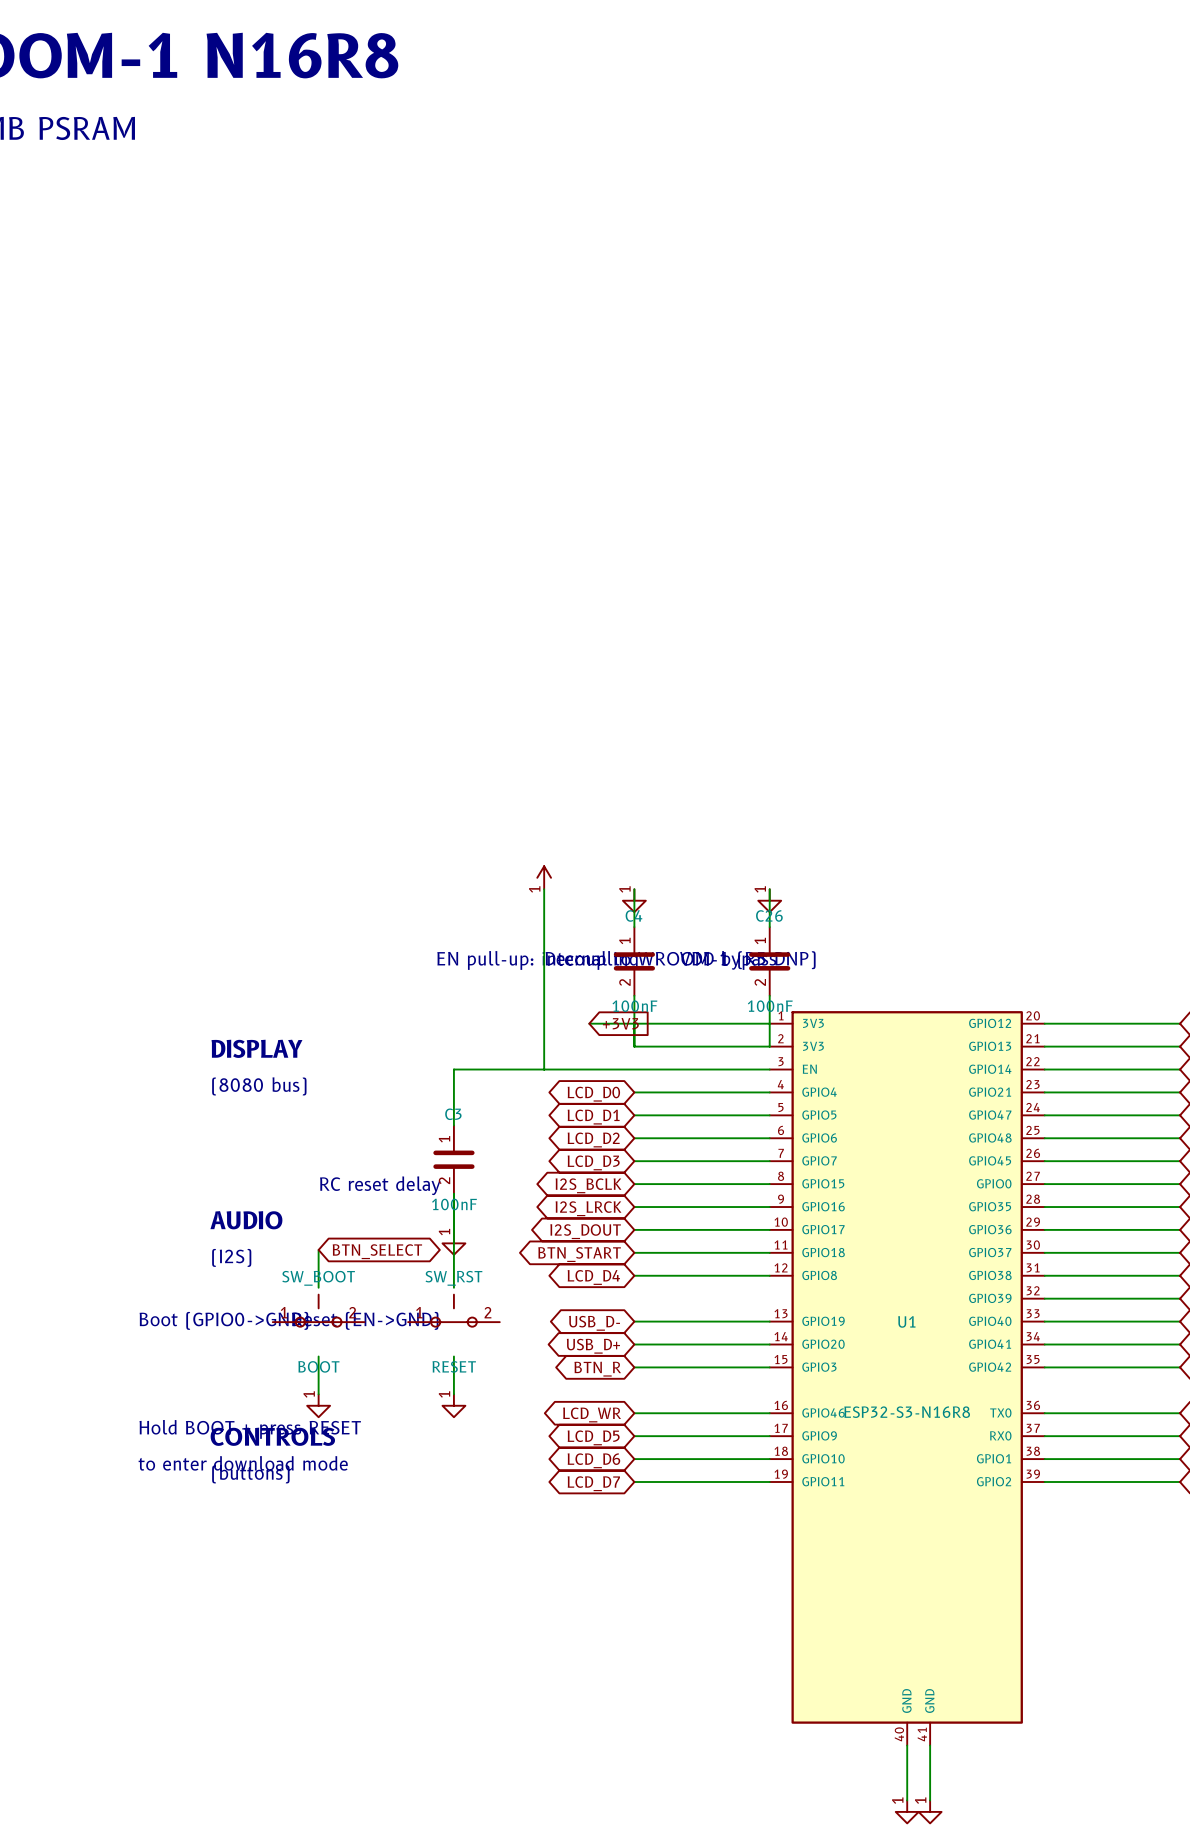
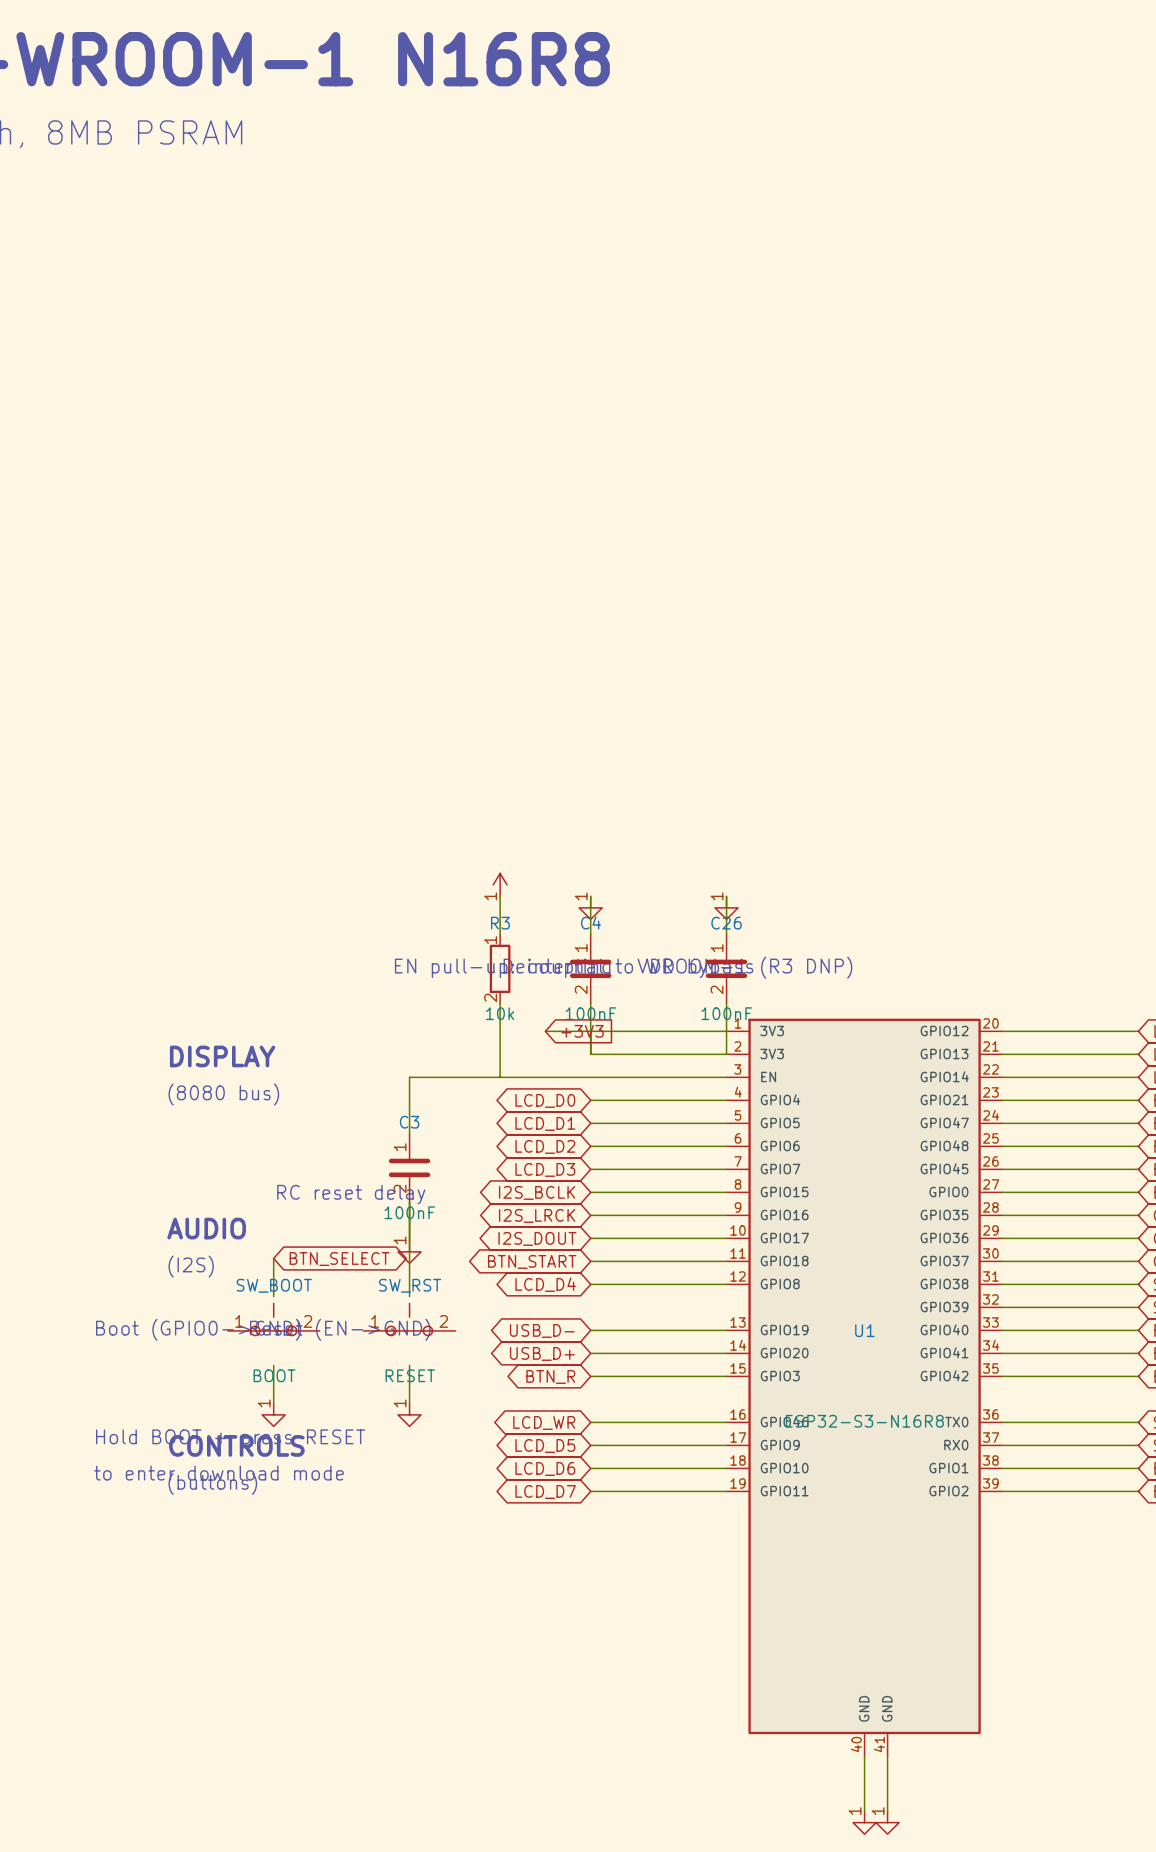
wire: (544, 927) (544, 995) -> none
R3: none -> 10k (500, 968)

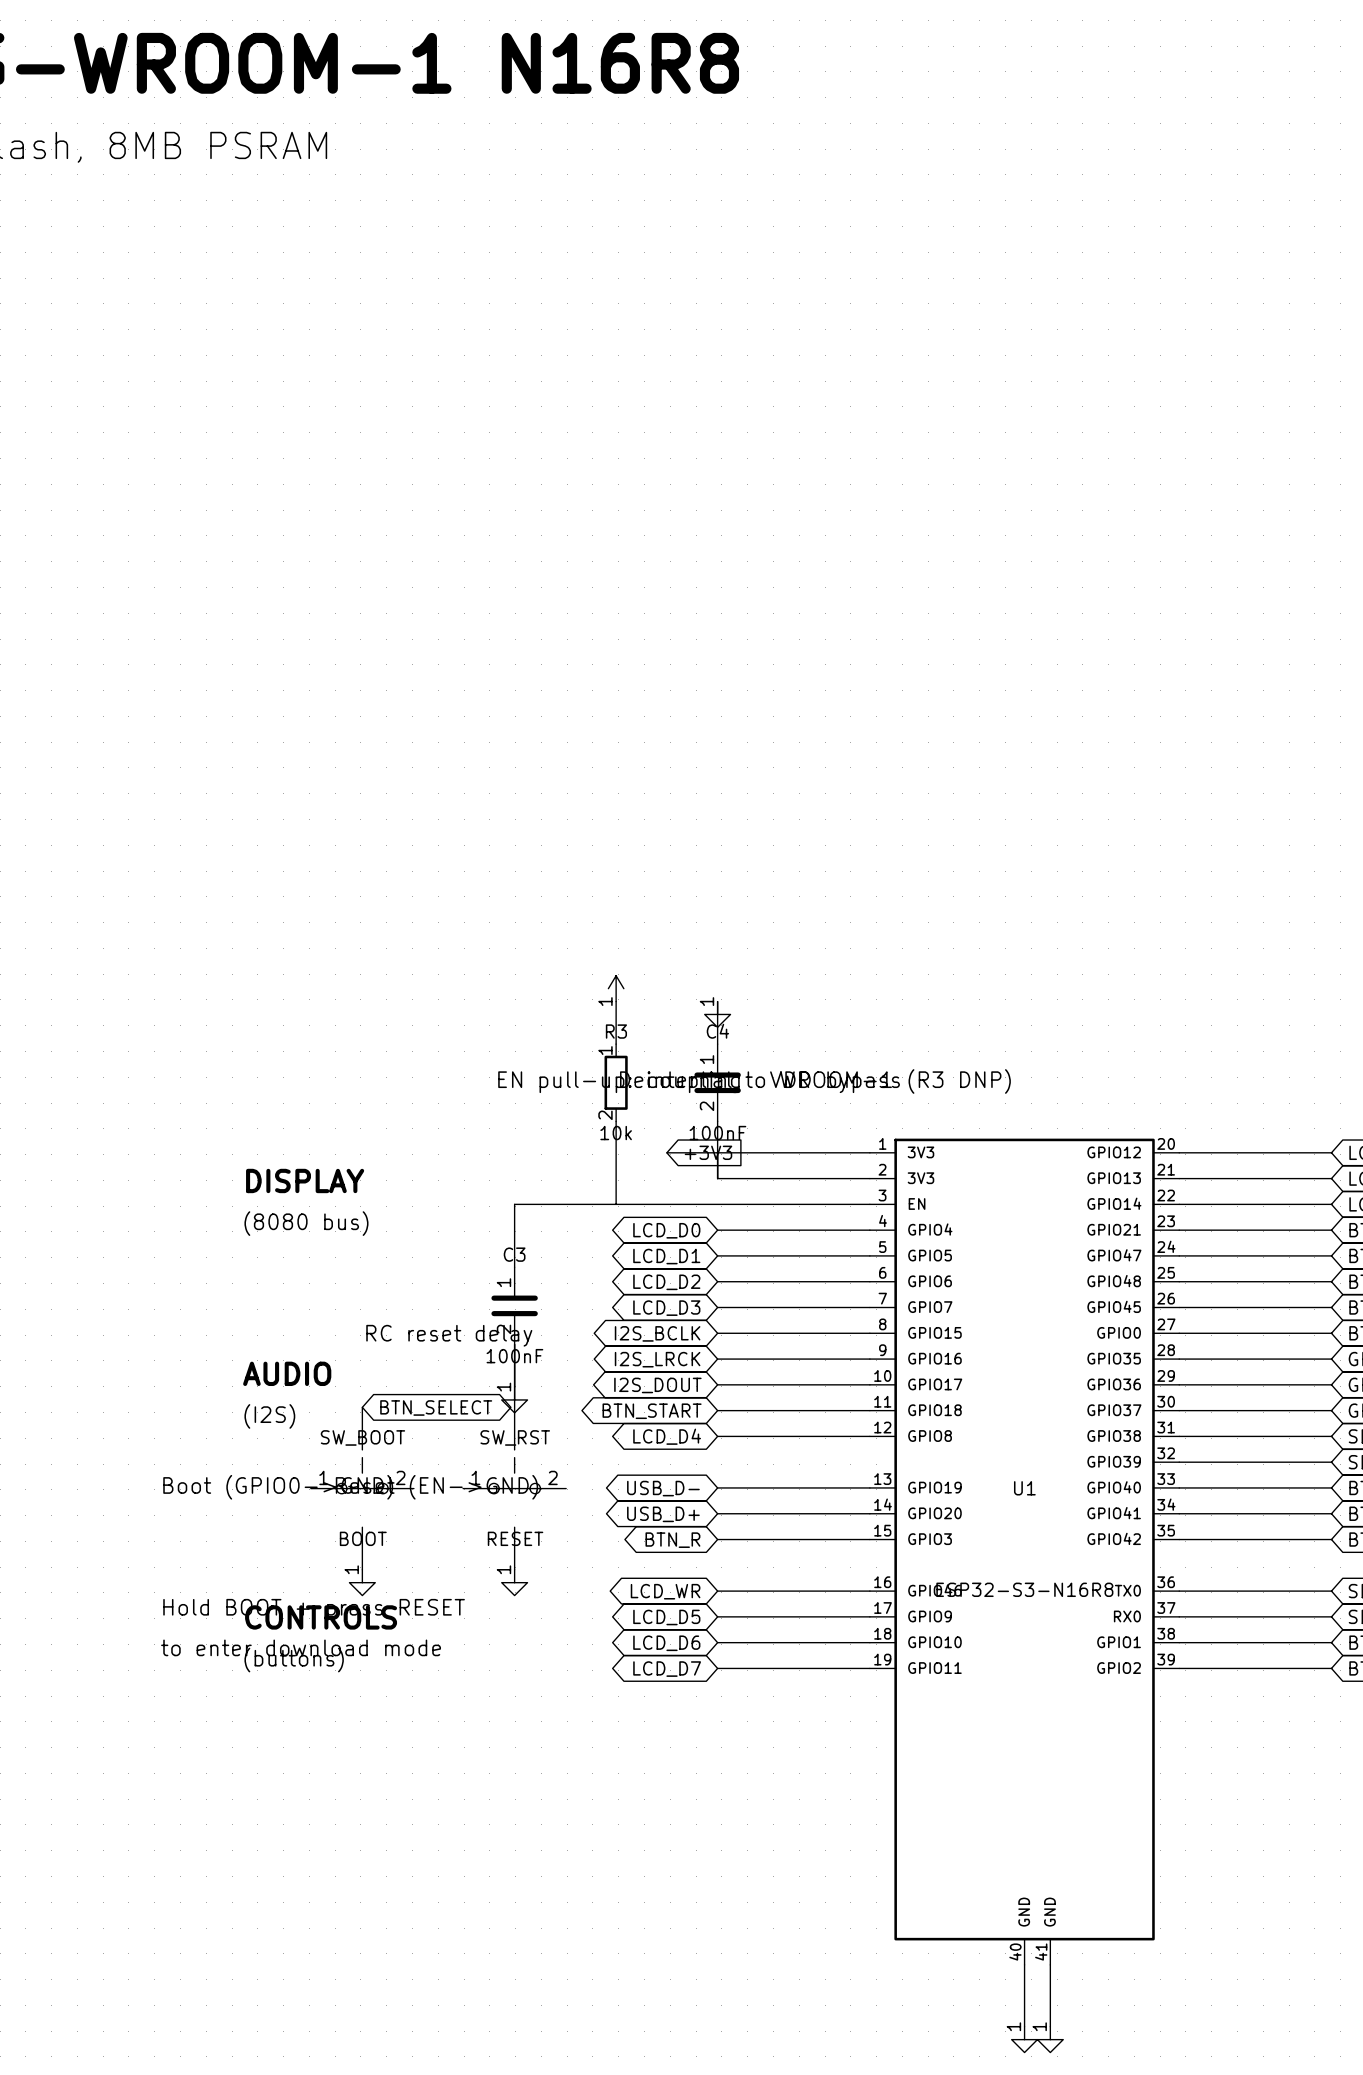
wire: (726, 896) (726, 934) -> none
power symbol: (726, 907) -> none
C26: 100nF (726, 968) -> none
wire: (726, 1003) (726, 1054) -> none

